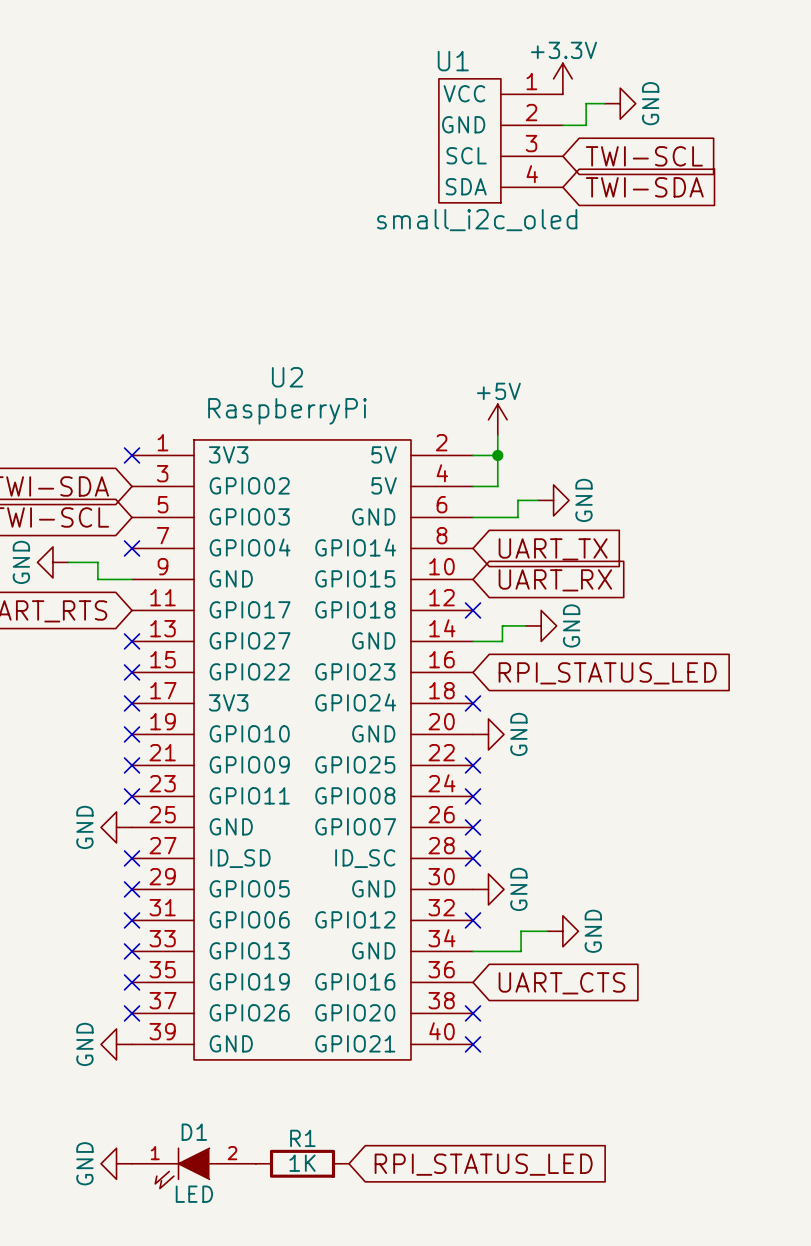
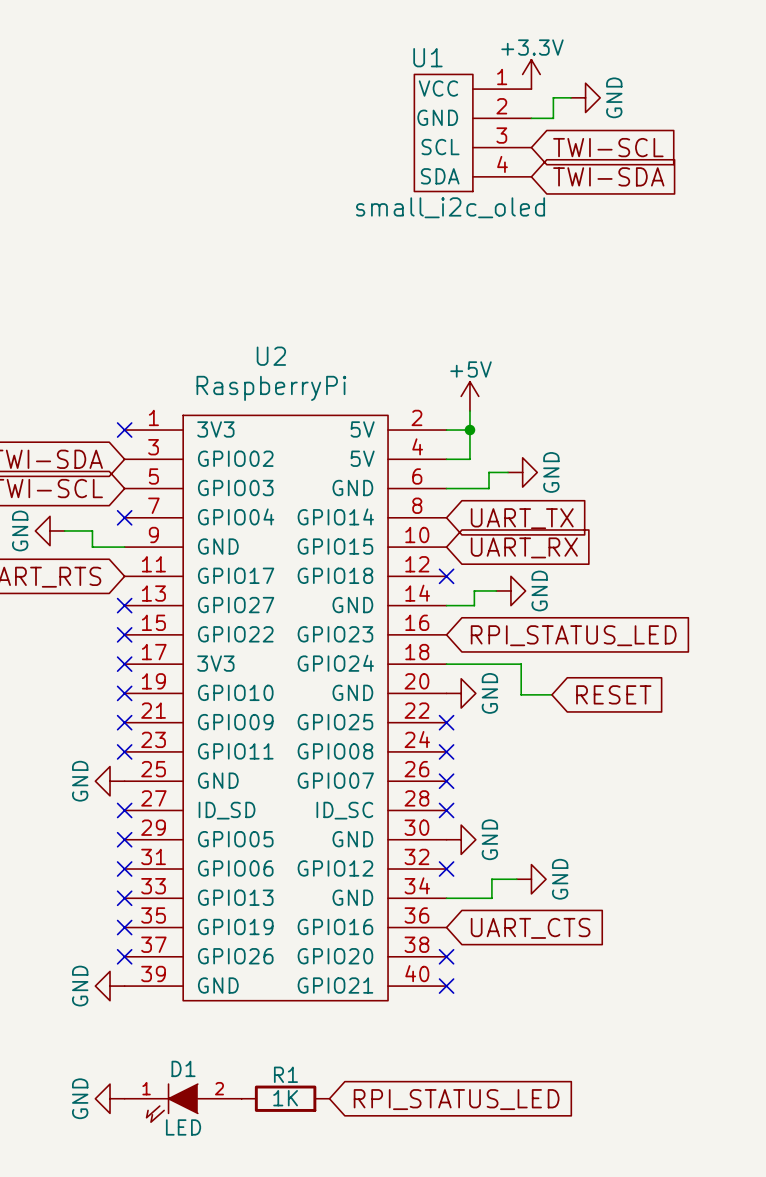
wire: none -> (446, 664) (521, 664) (521, 694) (551, 694)
no-connect mark: (472, 703) -> none
global label: none -> RESET (613, 694)

